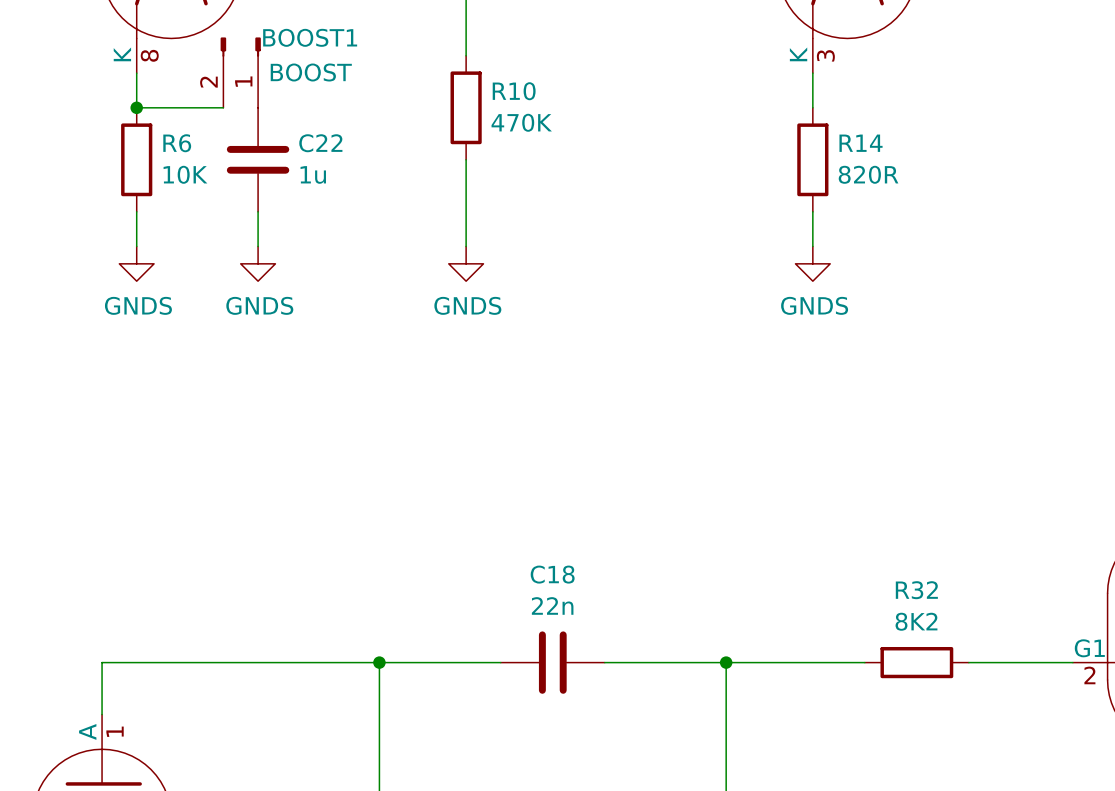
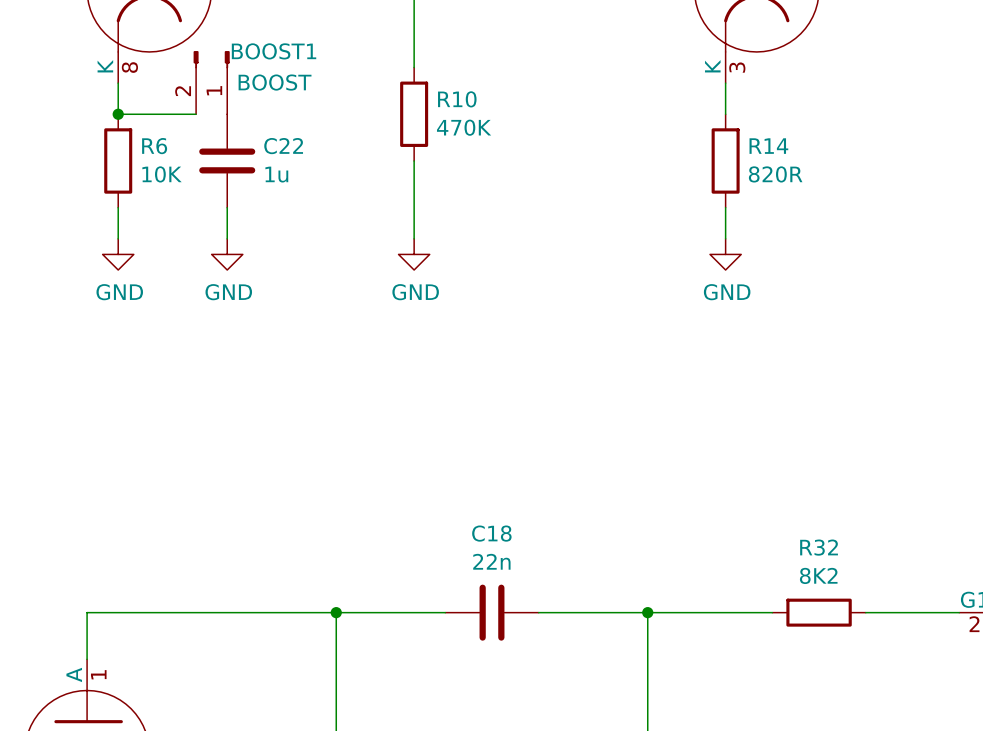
power symbol: GNDS (136, 263) -> GND (118, 254)
power symbol: GNDS (258, 263) -> GND (227, 254)
power symbol: GNDS (466, 263) -> GND (414, 254)
power symbol: GNDS (812, 263) -> GND (725, 254)

